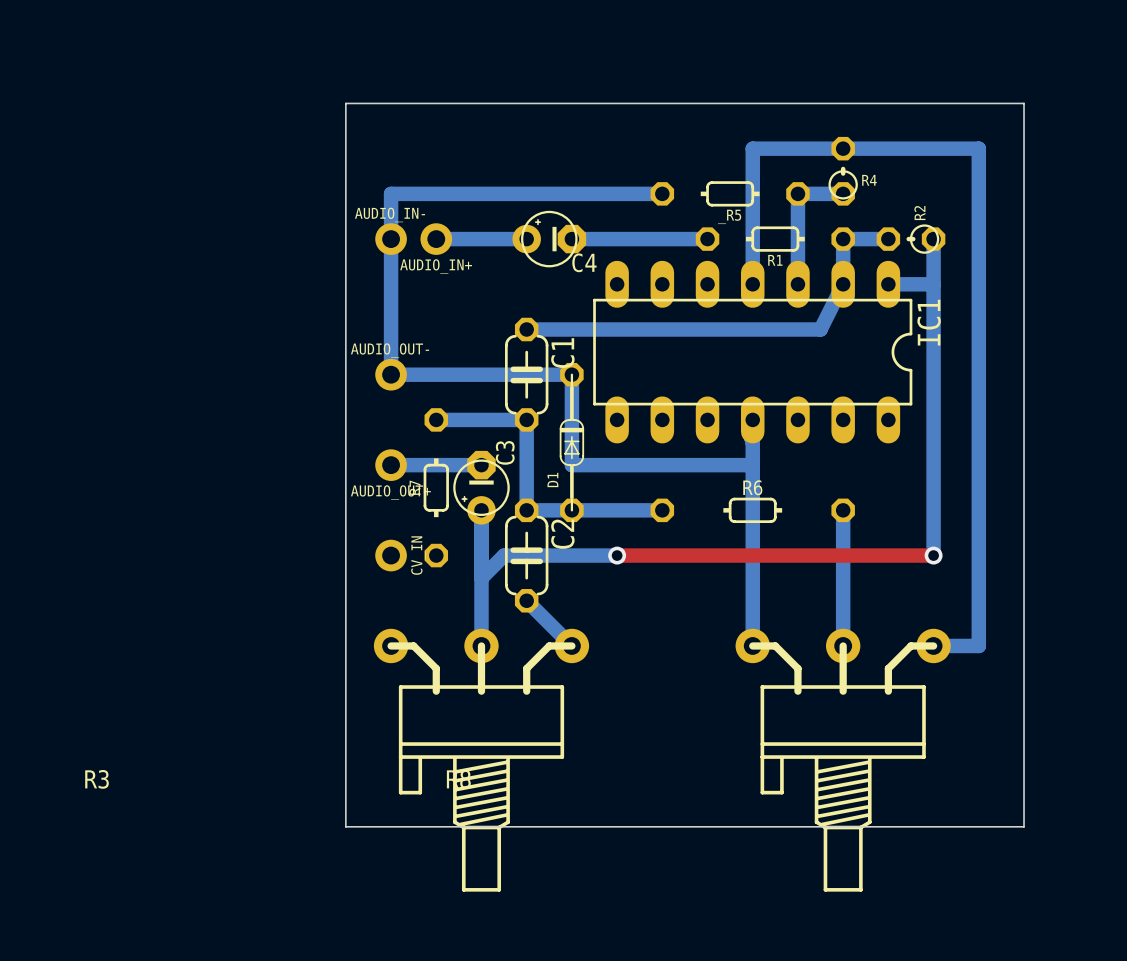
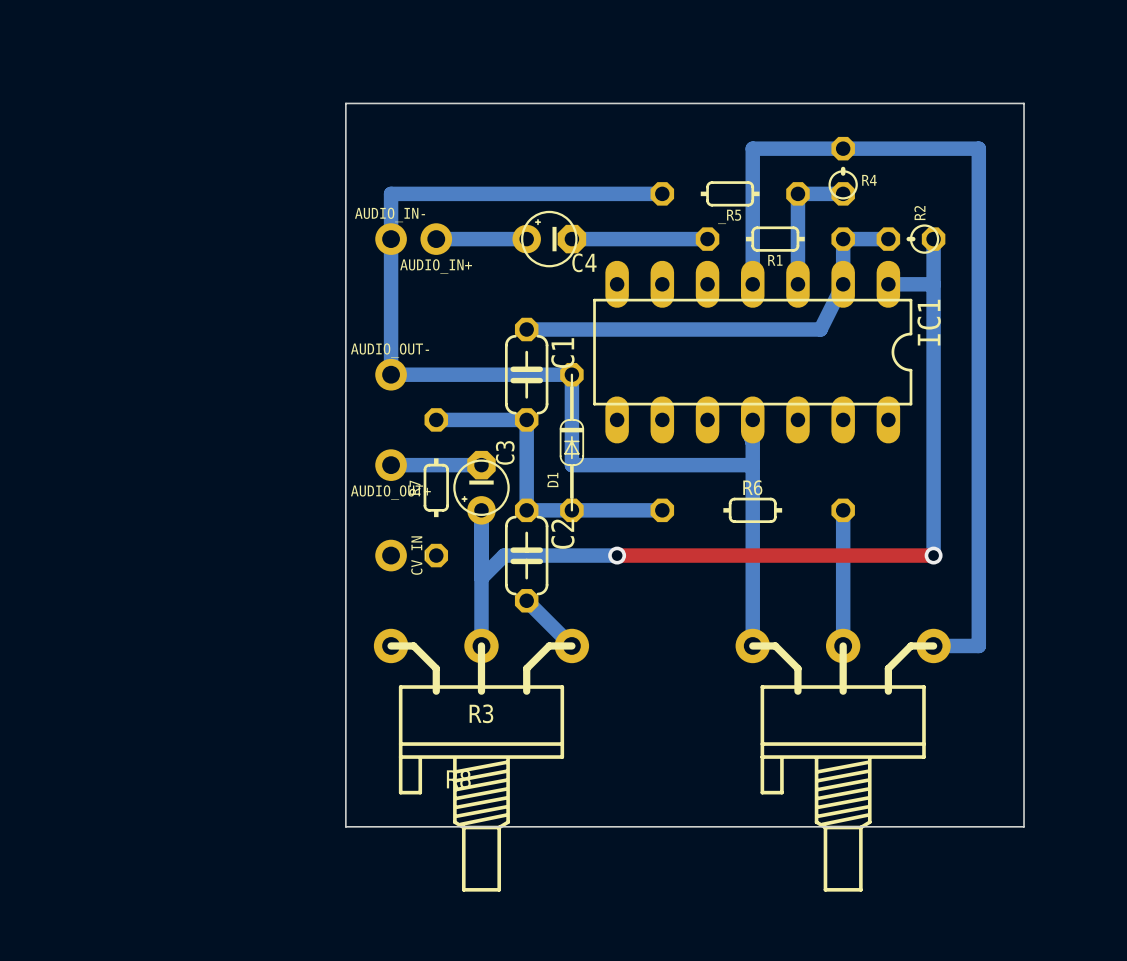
R3 name position: R3 (97, 779) -> R3 (481, 713)

